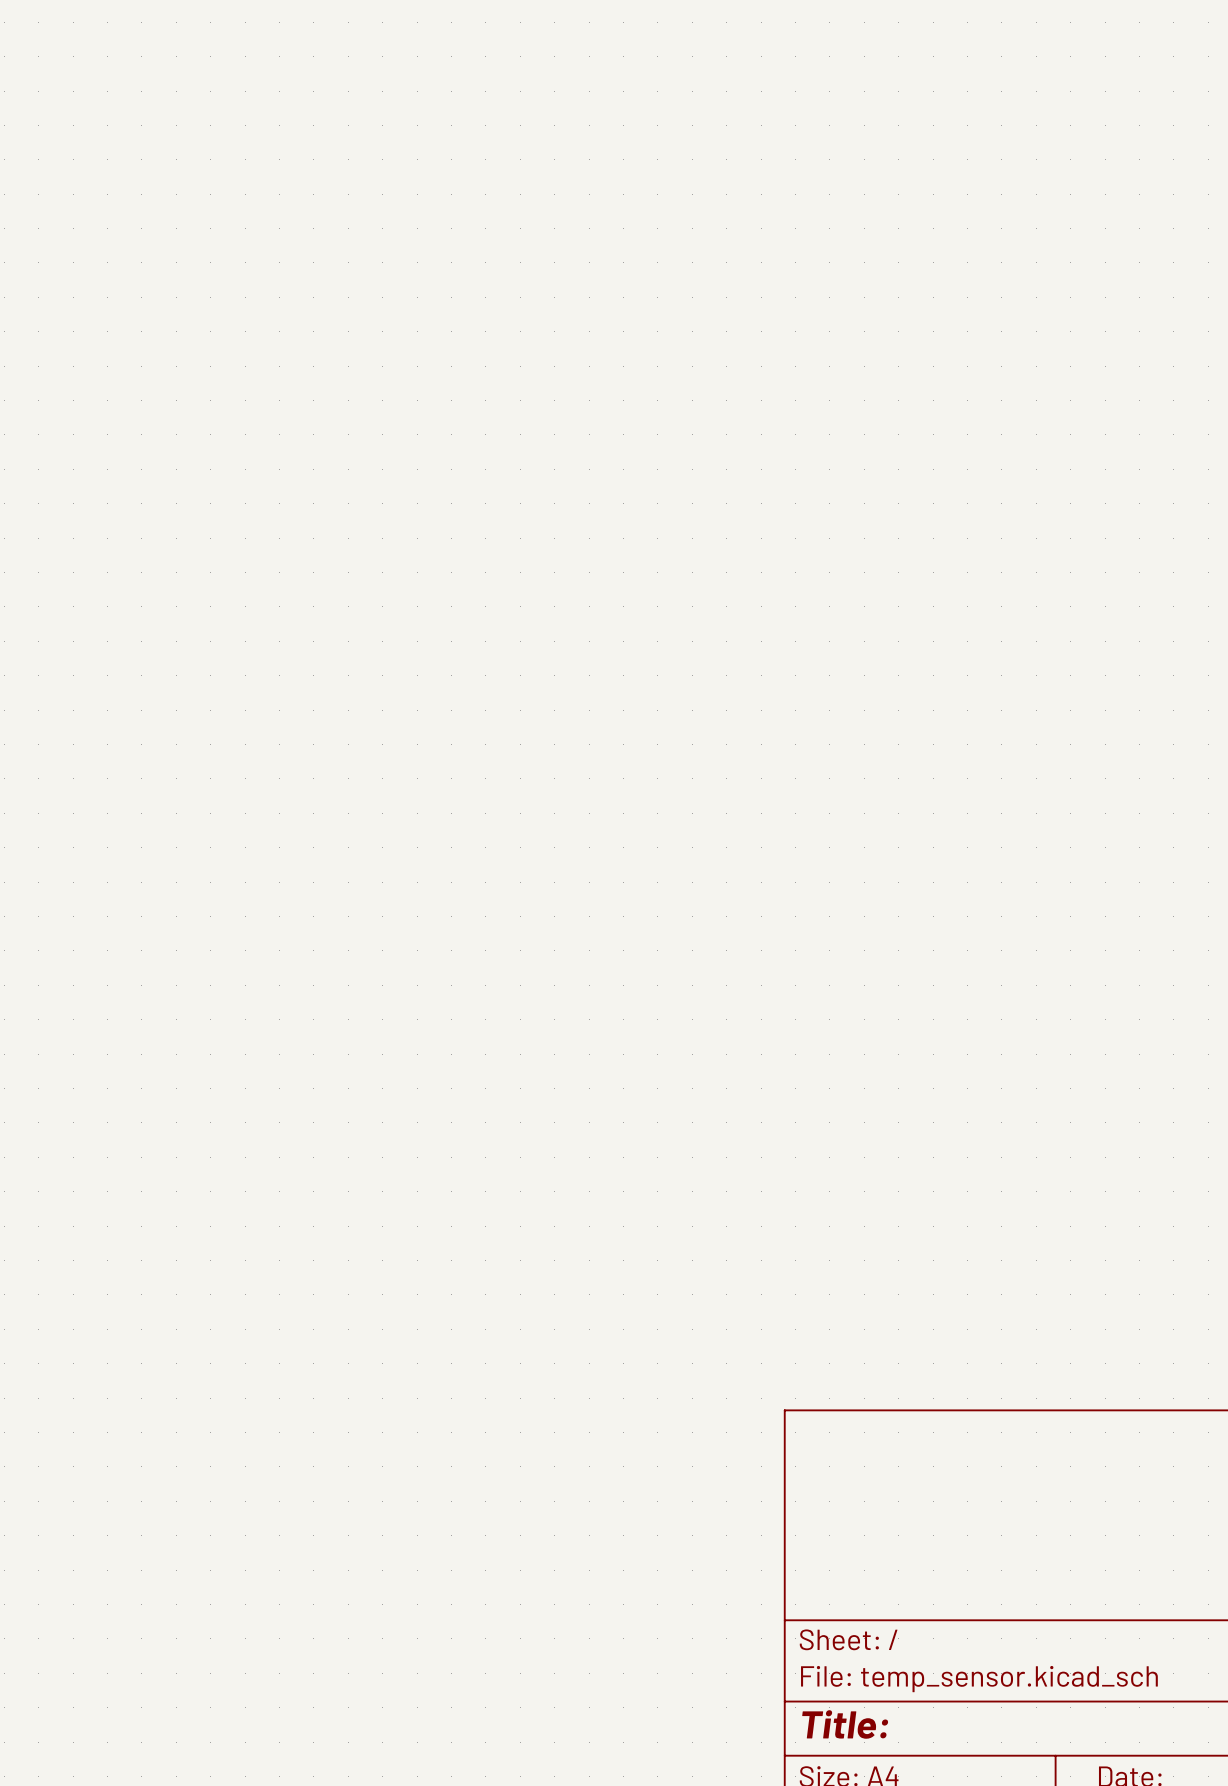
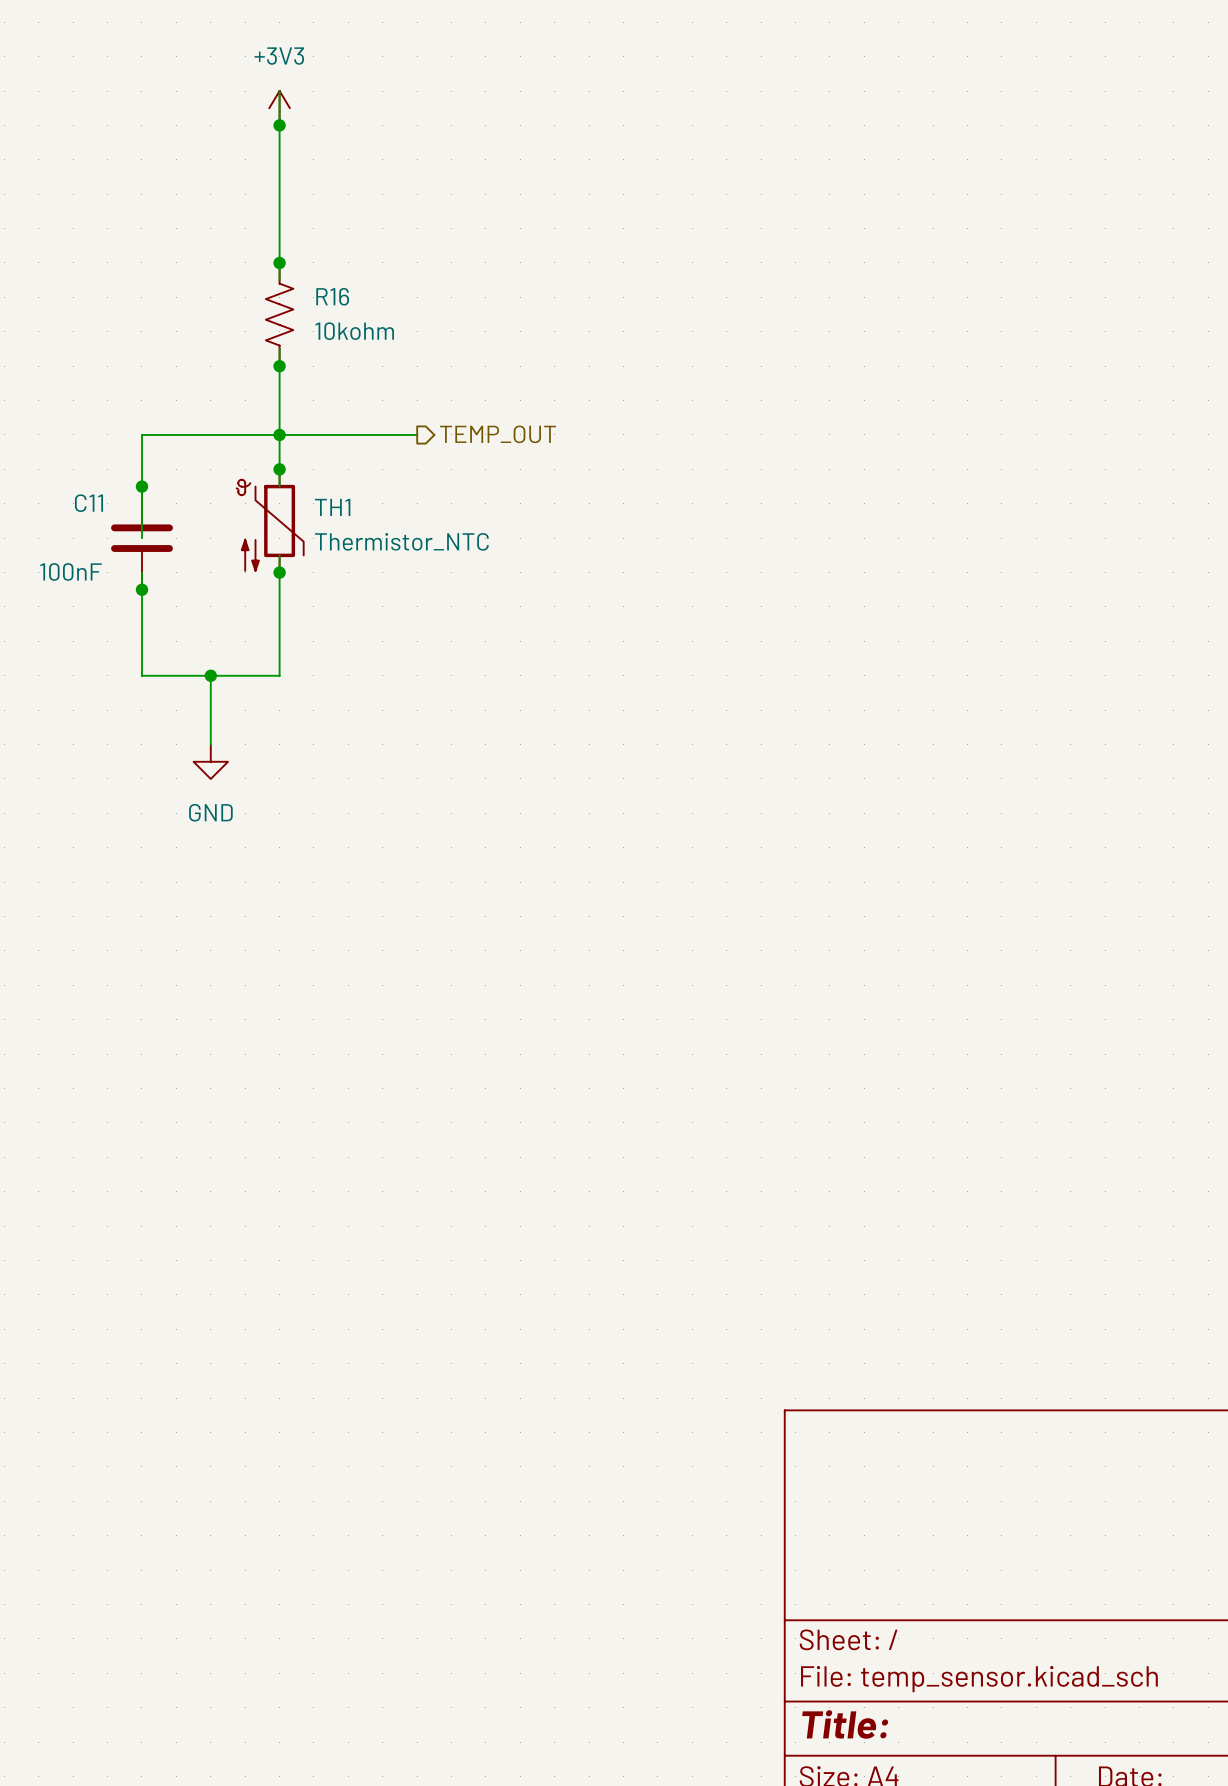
wire: none -> (279, 91) (279, 280)
power symbol: none -> +3V3 (279, 108)
junction: none -> (279, 125)
junction: none -> (279, 262)
R16: none -> 10kohm (279, 314)
wire: none -> (279, 348) (279, 486)
junction: none -> (279, 366)
junction: none -> (279, 434)
wire: none -> (417, 434) (141, 434) (141, 538)
hierarchical label: none -> TEMP_OUT (498, 434)
junction: none -> (279, 469)
junction: none -> (141, 486)
TH1: none -> Thermistor_NTC (270, 520)
C11: none -> 100nF (141, 538)
wire: none -> (279, 555) (279, 675) (141, 675) (141, 572)
junction: none -> (279, 572)
junction: none -> (141, 589)
wire: none -> (210, 675) (210, 744)
junction: none -> (210, 675)
power symbol: none -> GND (210, 761)

